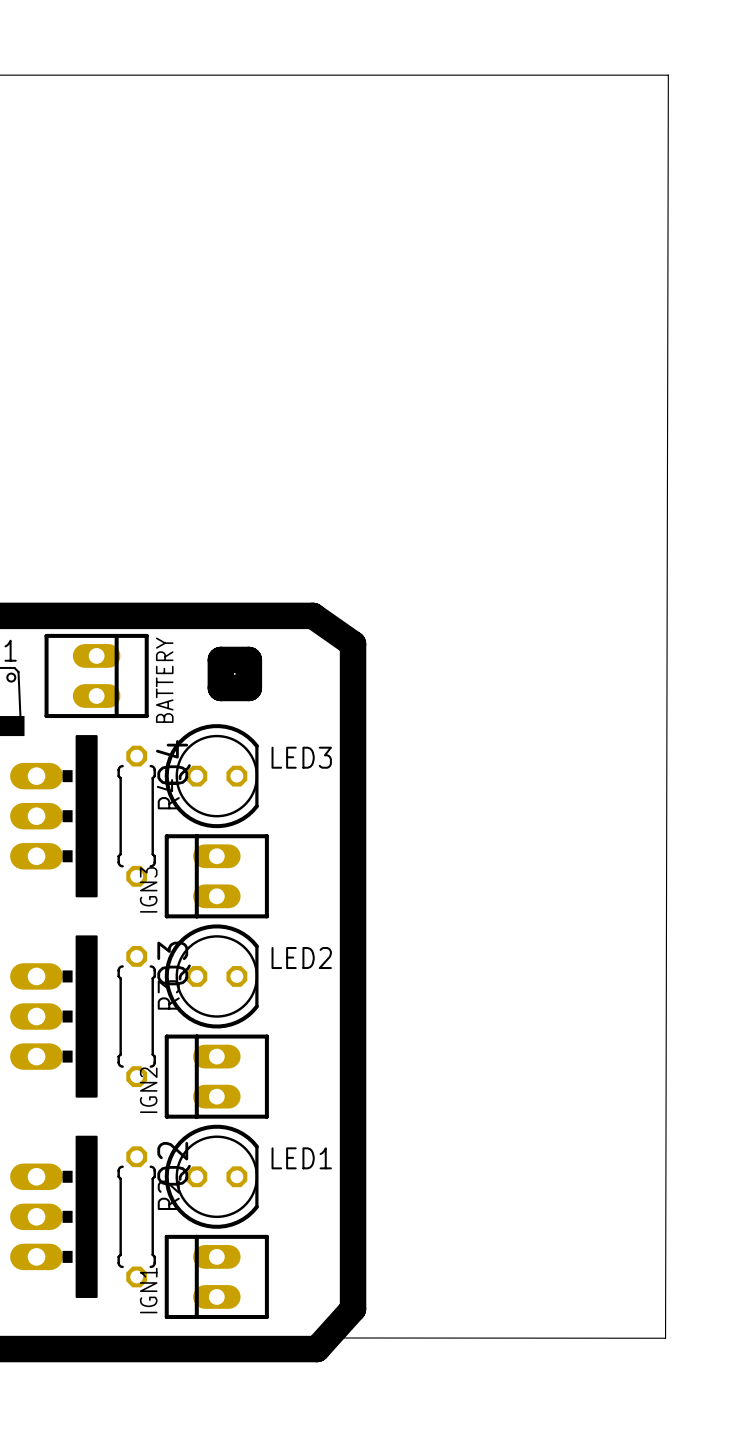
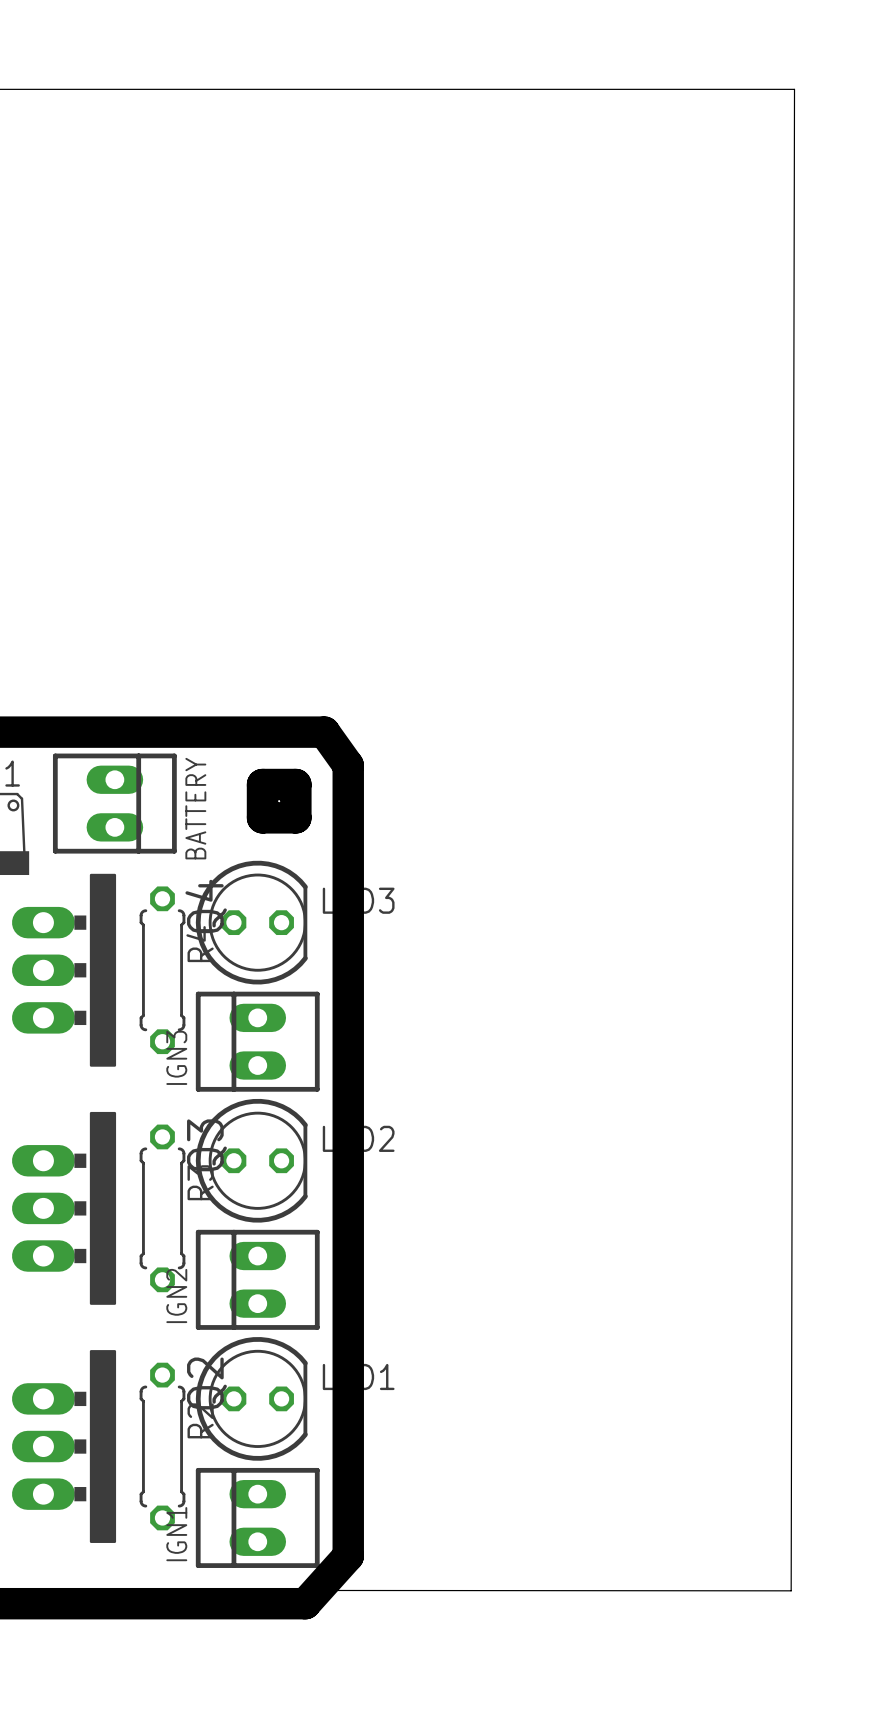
board edge: (272, 615) (312, 615) (353, 643) (353, 1308) (316, 1349) (256, 1349) -> (324, 732) (348, 765) (348, 1556) (305, 1603)

